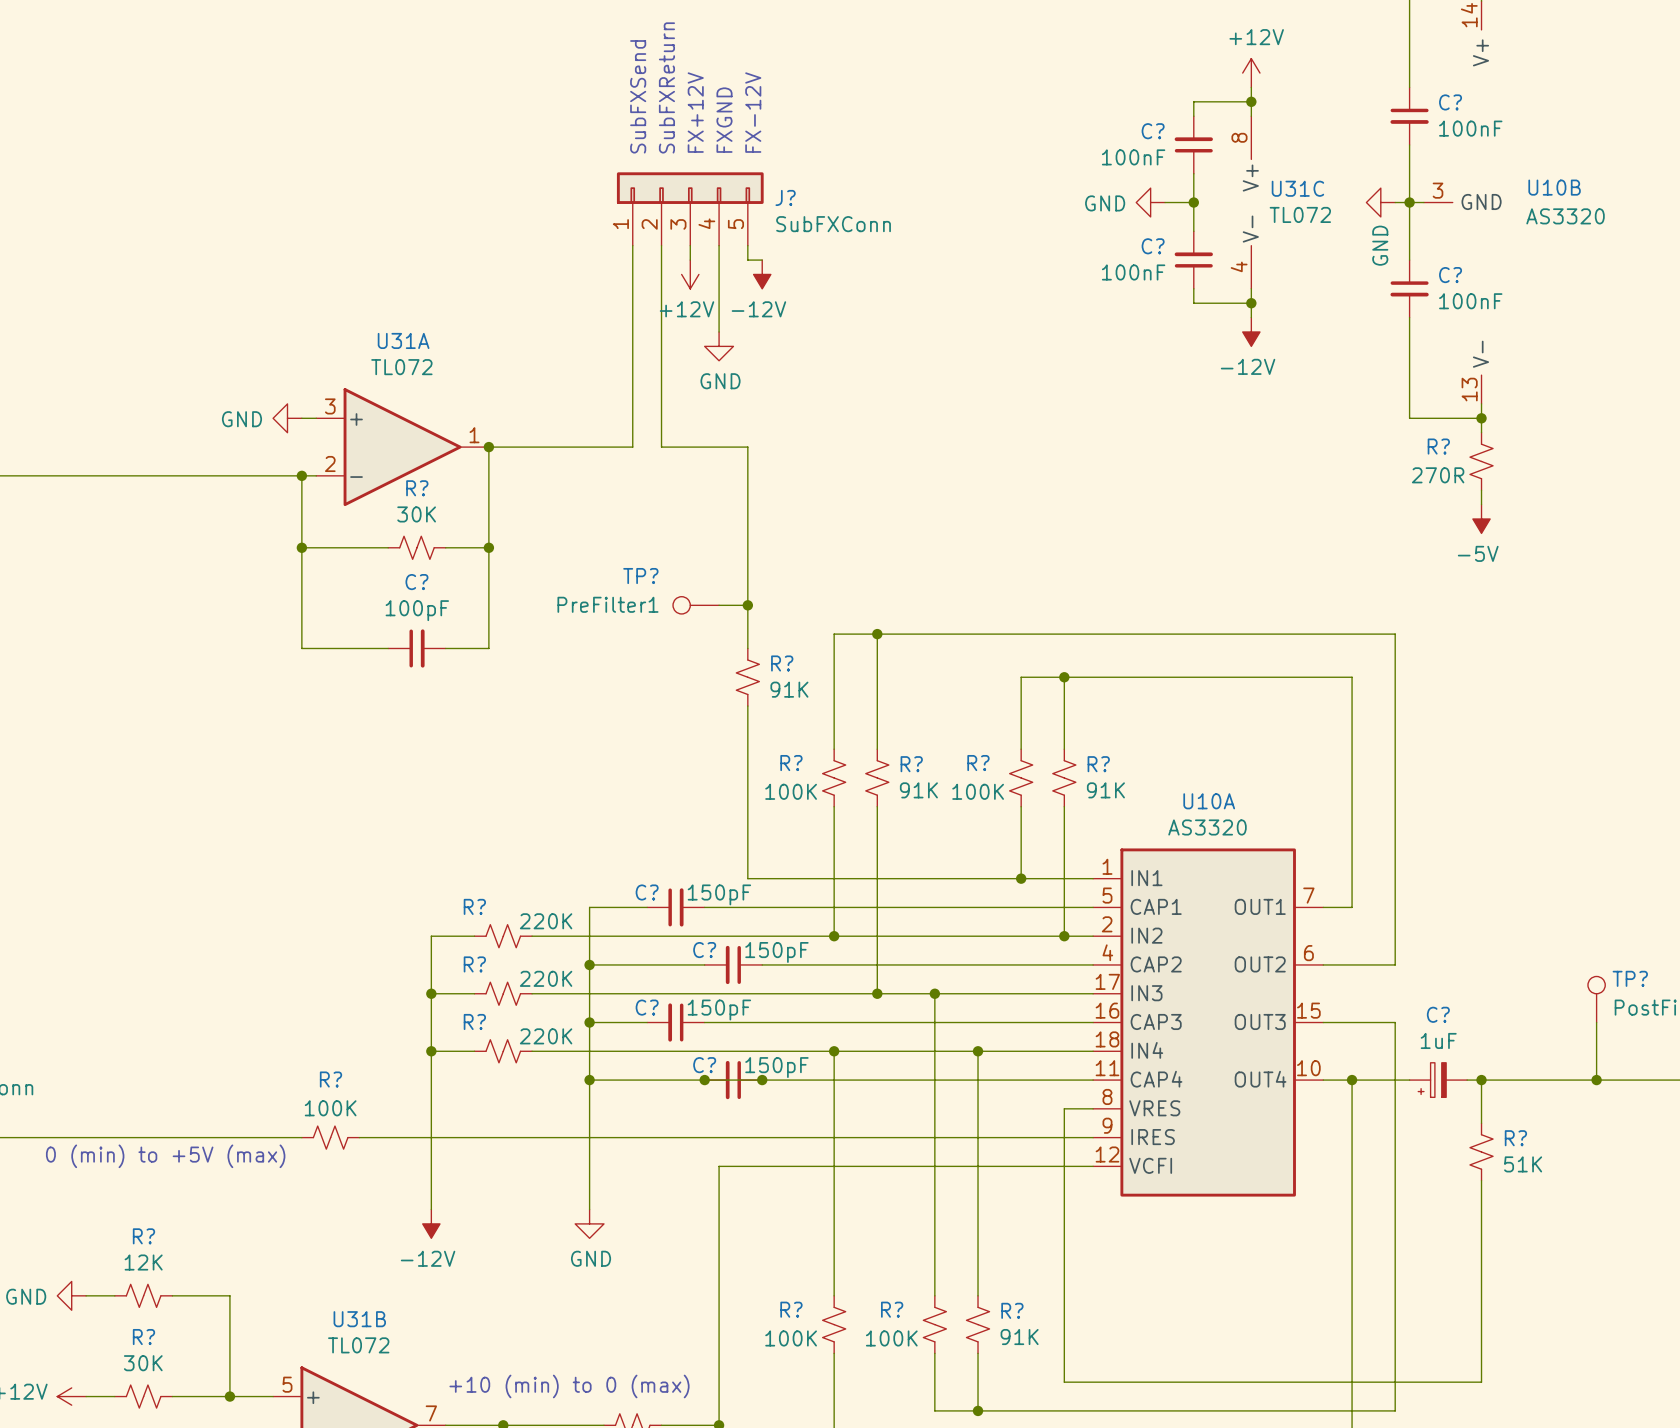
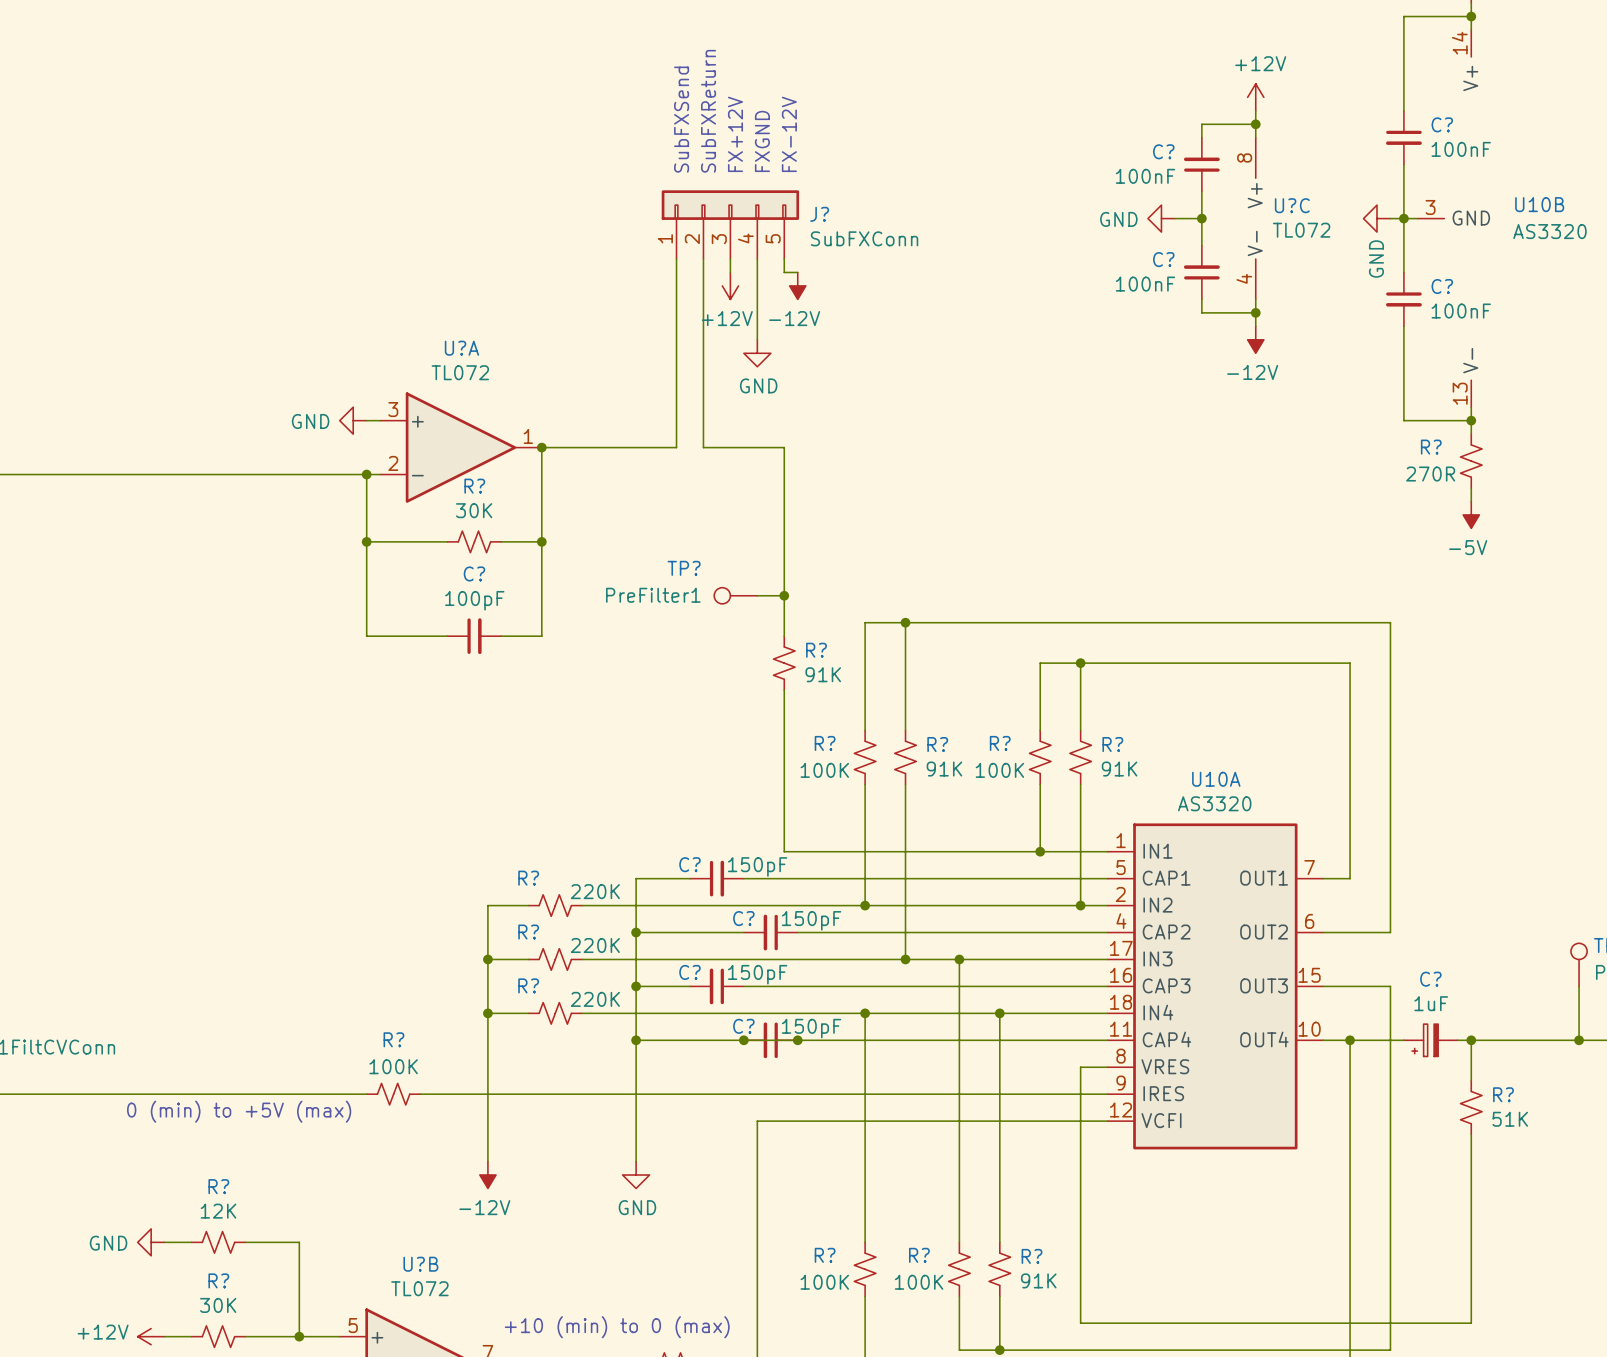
U31C name: U31C (1297, 188) -> U?C (1292, 205)
U31A name: U31A (403, 340) -> U?A (461, 348)
U31B name: U31B (359, 1319) -> U?B (420, 1264)

